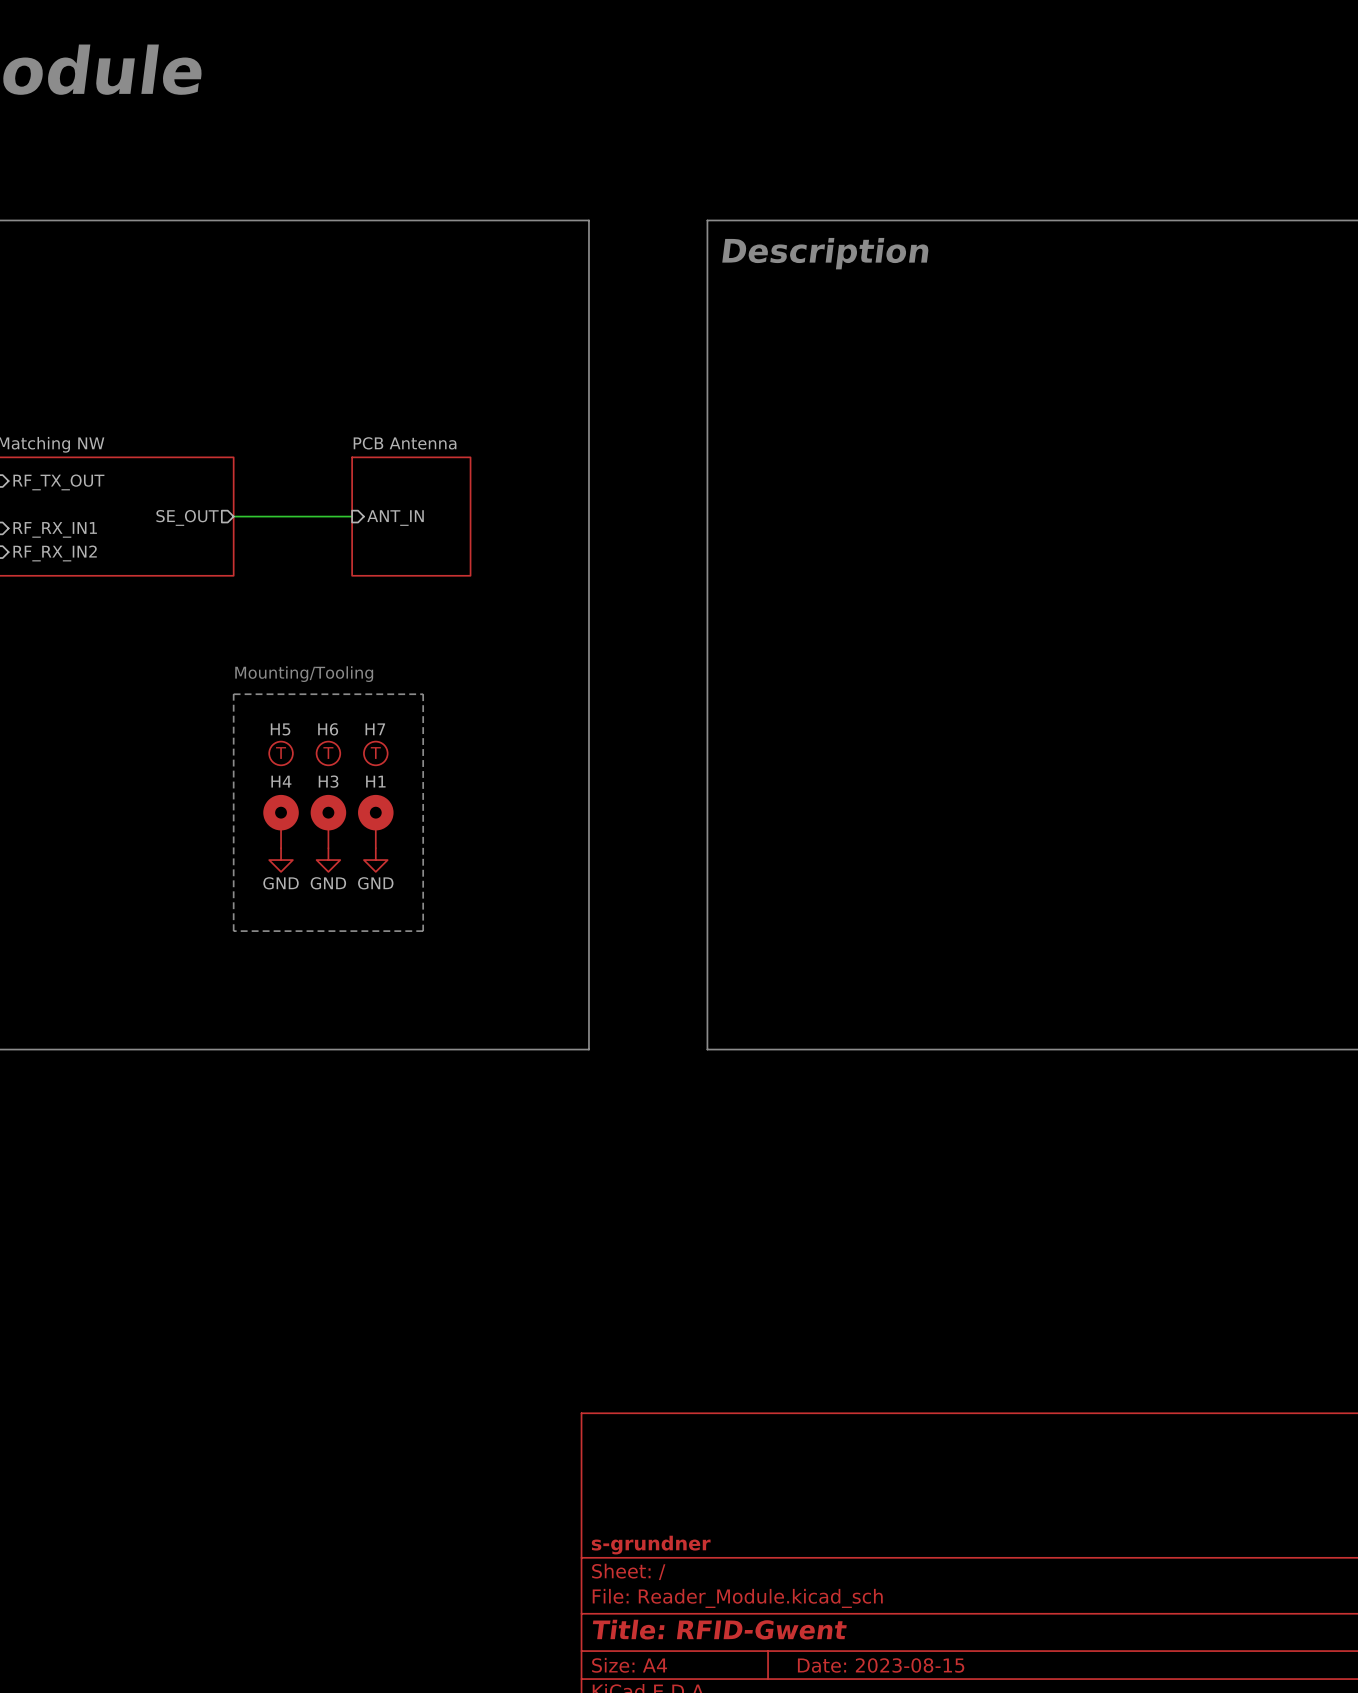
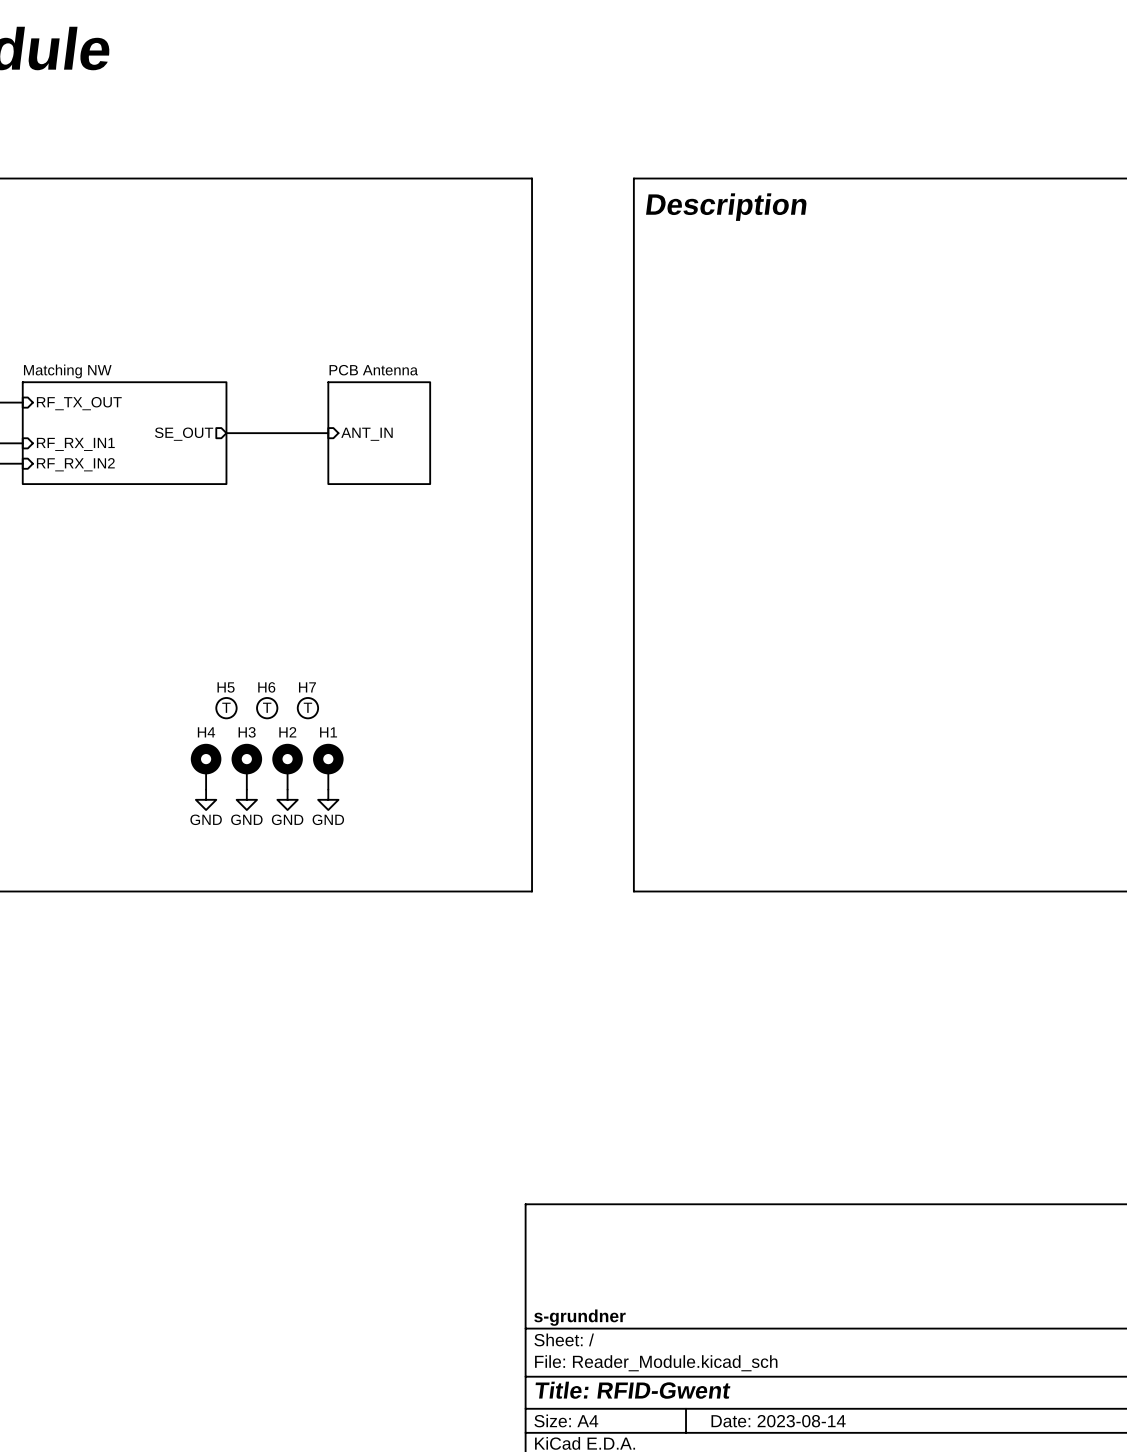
text: Mounting/Tooling (304, 674) -> none
line: (233, 694) (423, 694) (423, 931) (233, 931) (233, 694) -> none
H5 position: (281, 753) -> (226, 708)
H6 position: (328, 753) -> (267, 708)
H7 position: (375, 753) -> (307, 708)
H4 position: (281, 821) -> (206, 766)
H3 position: (328, 821) -> (246, 766)
H1 position: (375, 821) -> (328, 766)
power symbol: GND (281, 860) -> none
power symbol: GND (328, 860) -> none
power symbol: GND (375, 860) -> none
H2: none -> (287, 766)
power symbol: none -> GND (206, 799)
power symbol: none -> GND (246, 799)
power symbol: none -> GND (287, 799)
power symbol: none -> GND (328, 799)
title block: Date: 2023-08-15 (881, 1665) -> Date: 2023-08-14 (778, 1421)

